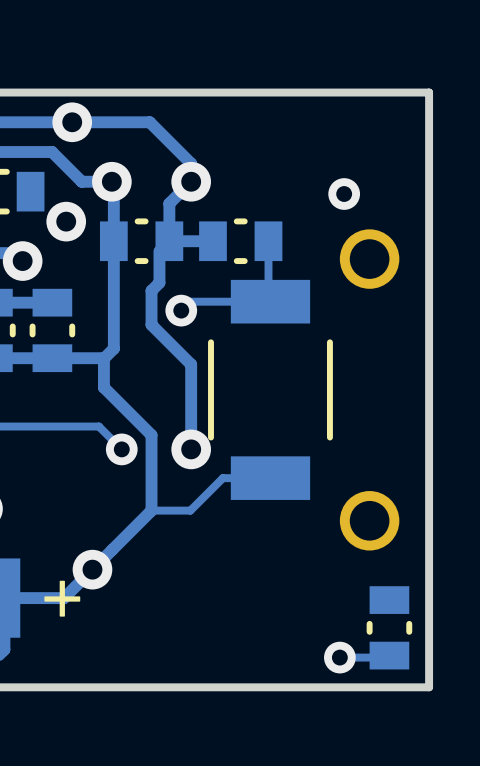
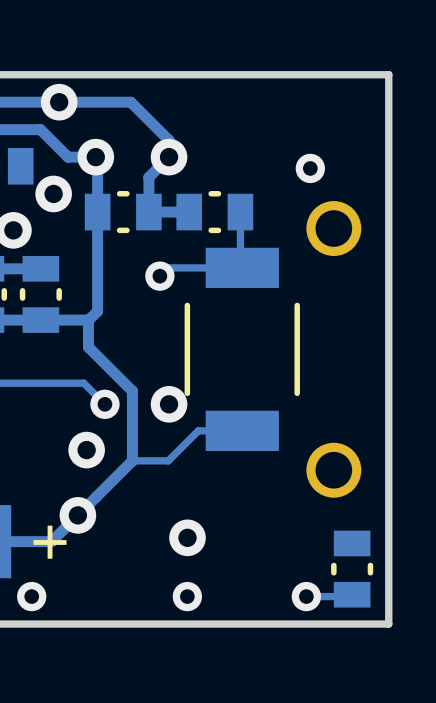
track: (159, 251) (159, 282) (151, 290) (151, 324) (191, 364) (191, 449) -> none
via: none -> (86, 450)
via: none -> (187, 537)
via: none -> (31, 596)
via: none -> (187, 596)

